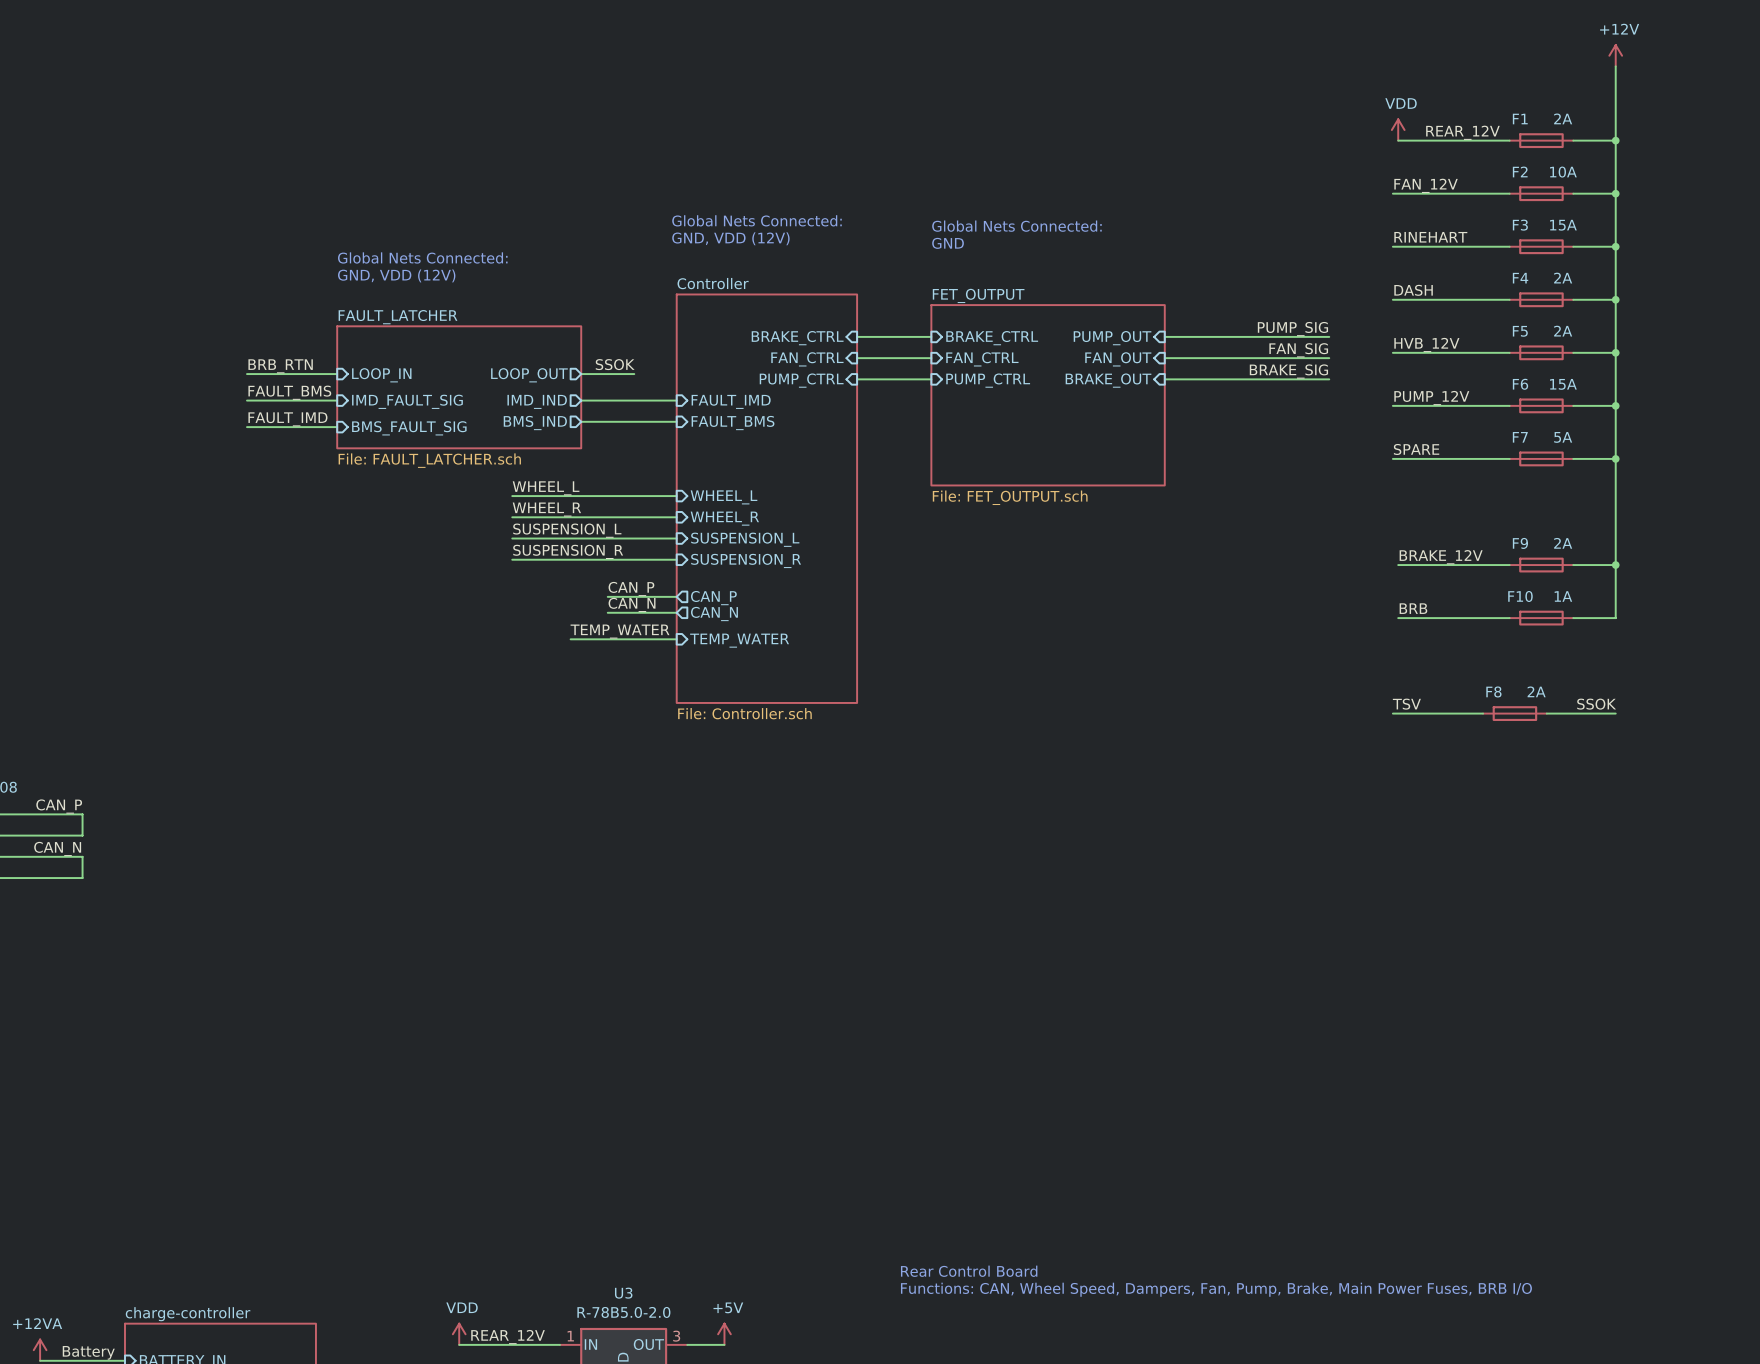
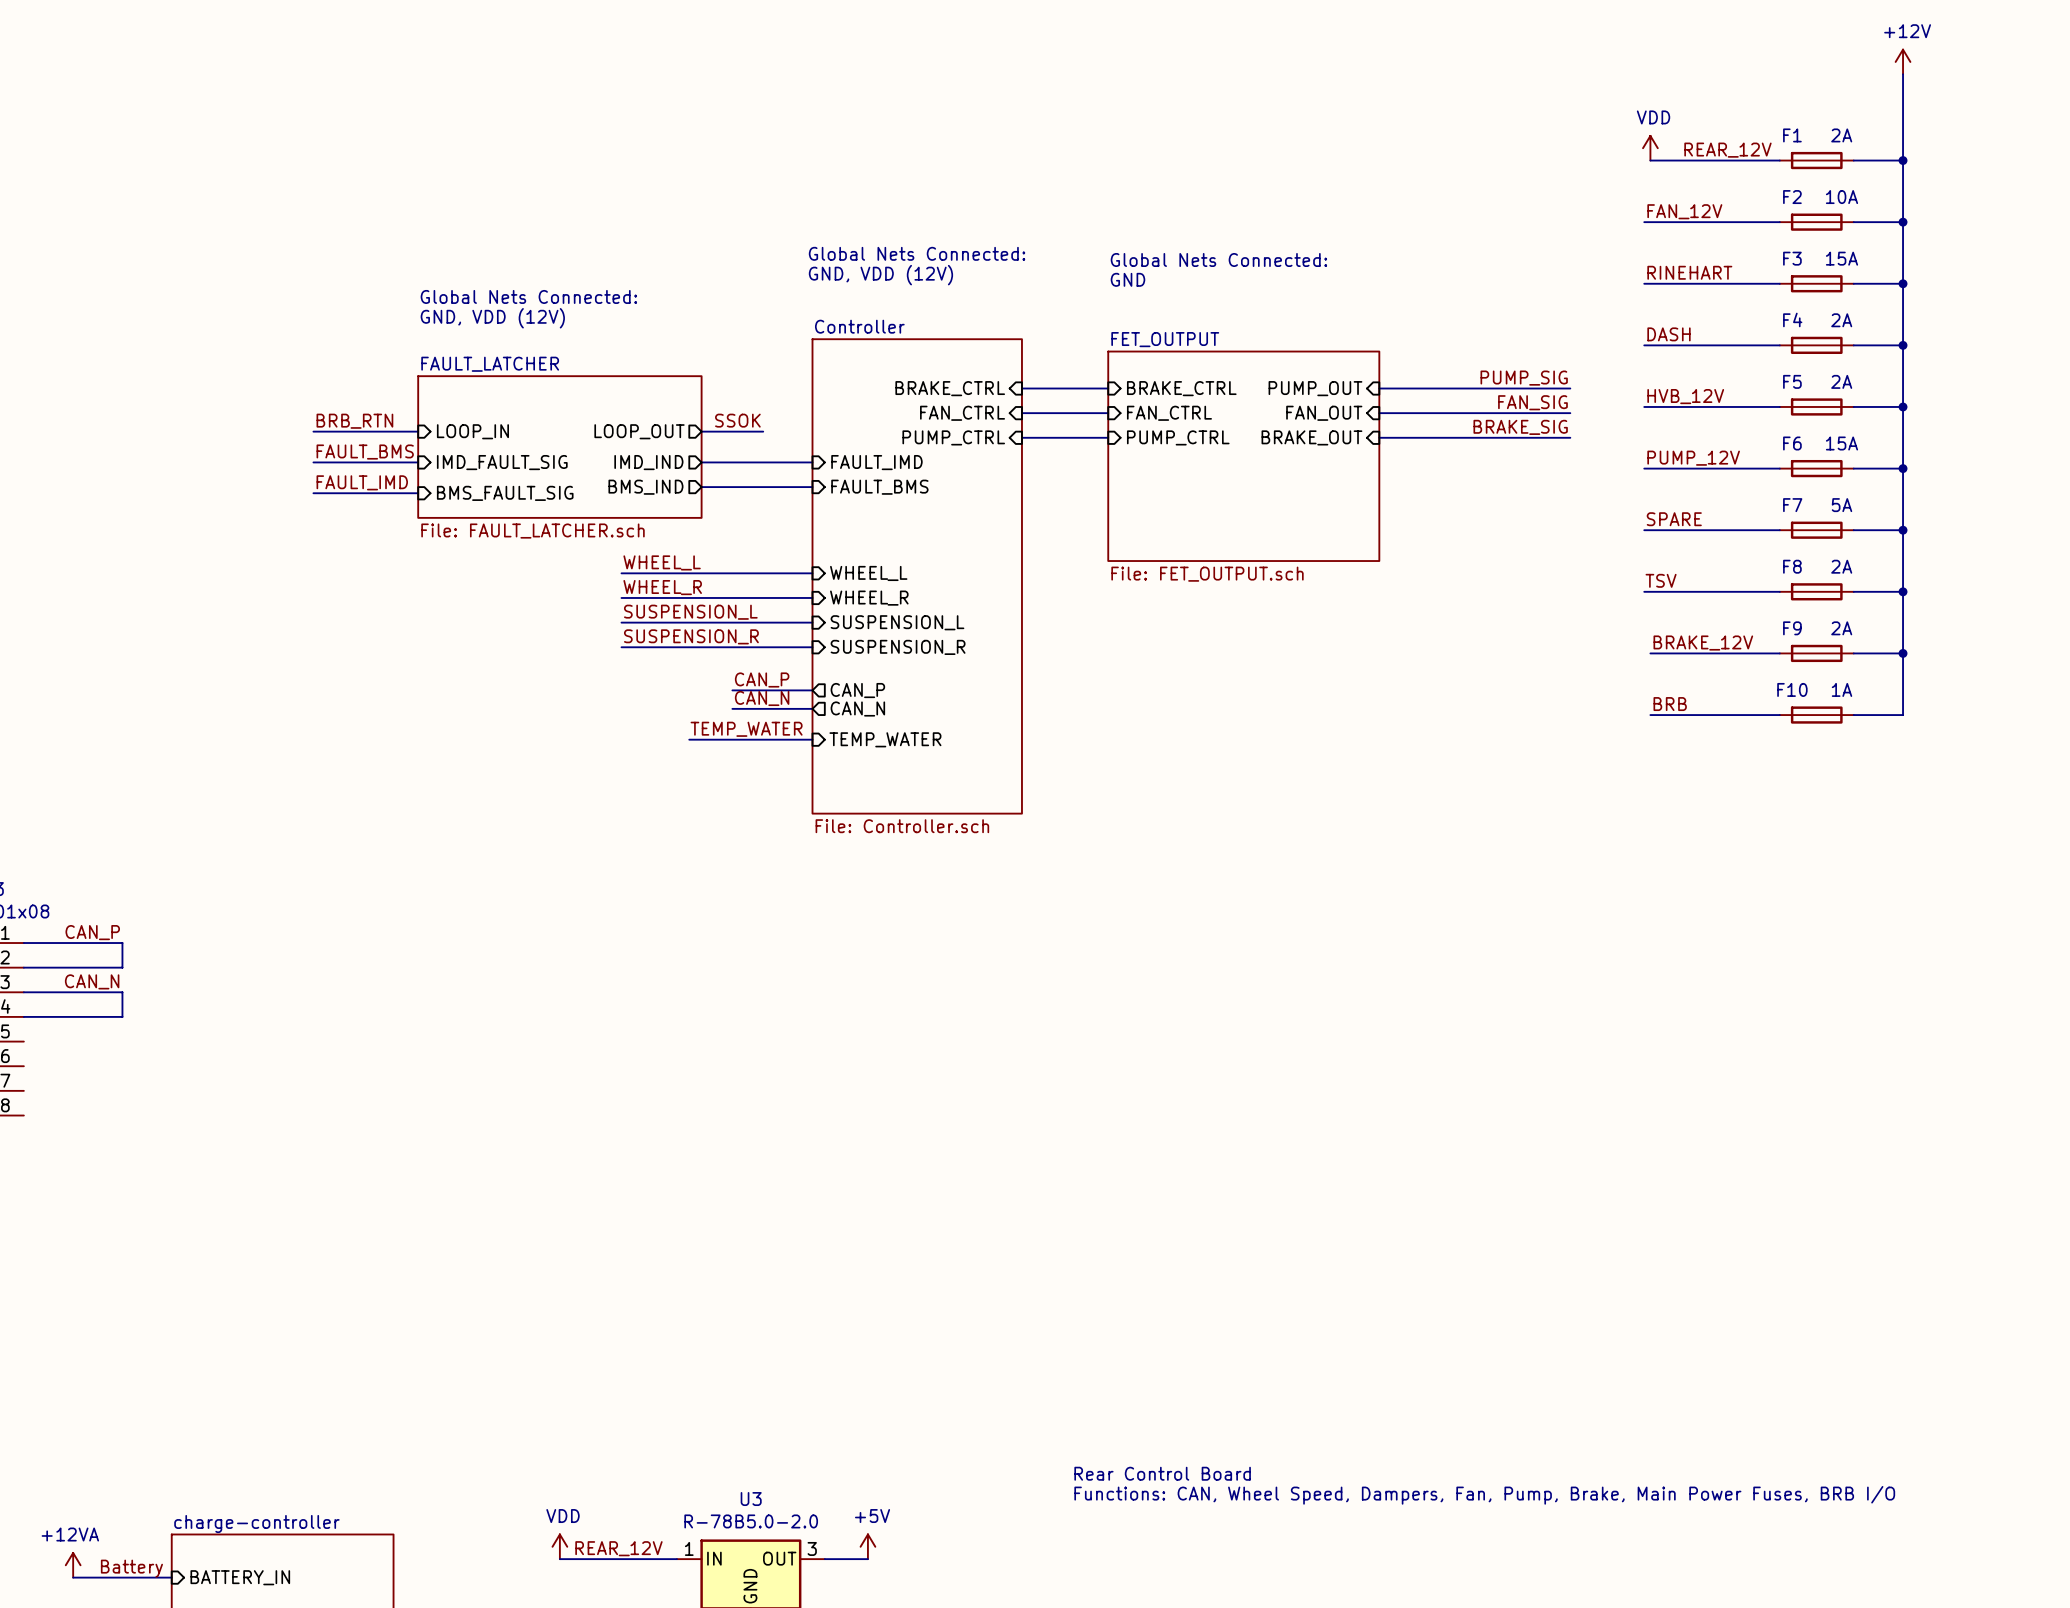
wire: none -> (1644, 591) (1779, 591)
wire: none -> (1853, 591) (1903, 591)
junction: none -> (1903, 591)
label position: TSV (1406, 704) -> TSV (1661, 580)
label: SSOK (1596, 704) -> none
wire: (1392, 713) (1483, 713) -> none
F8 position: (1514, 713) -> (1816, 591)
wire: (1546, 713) (1615, 713) -> none

